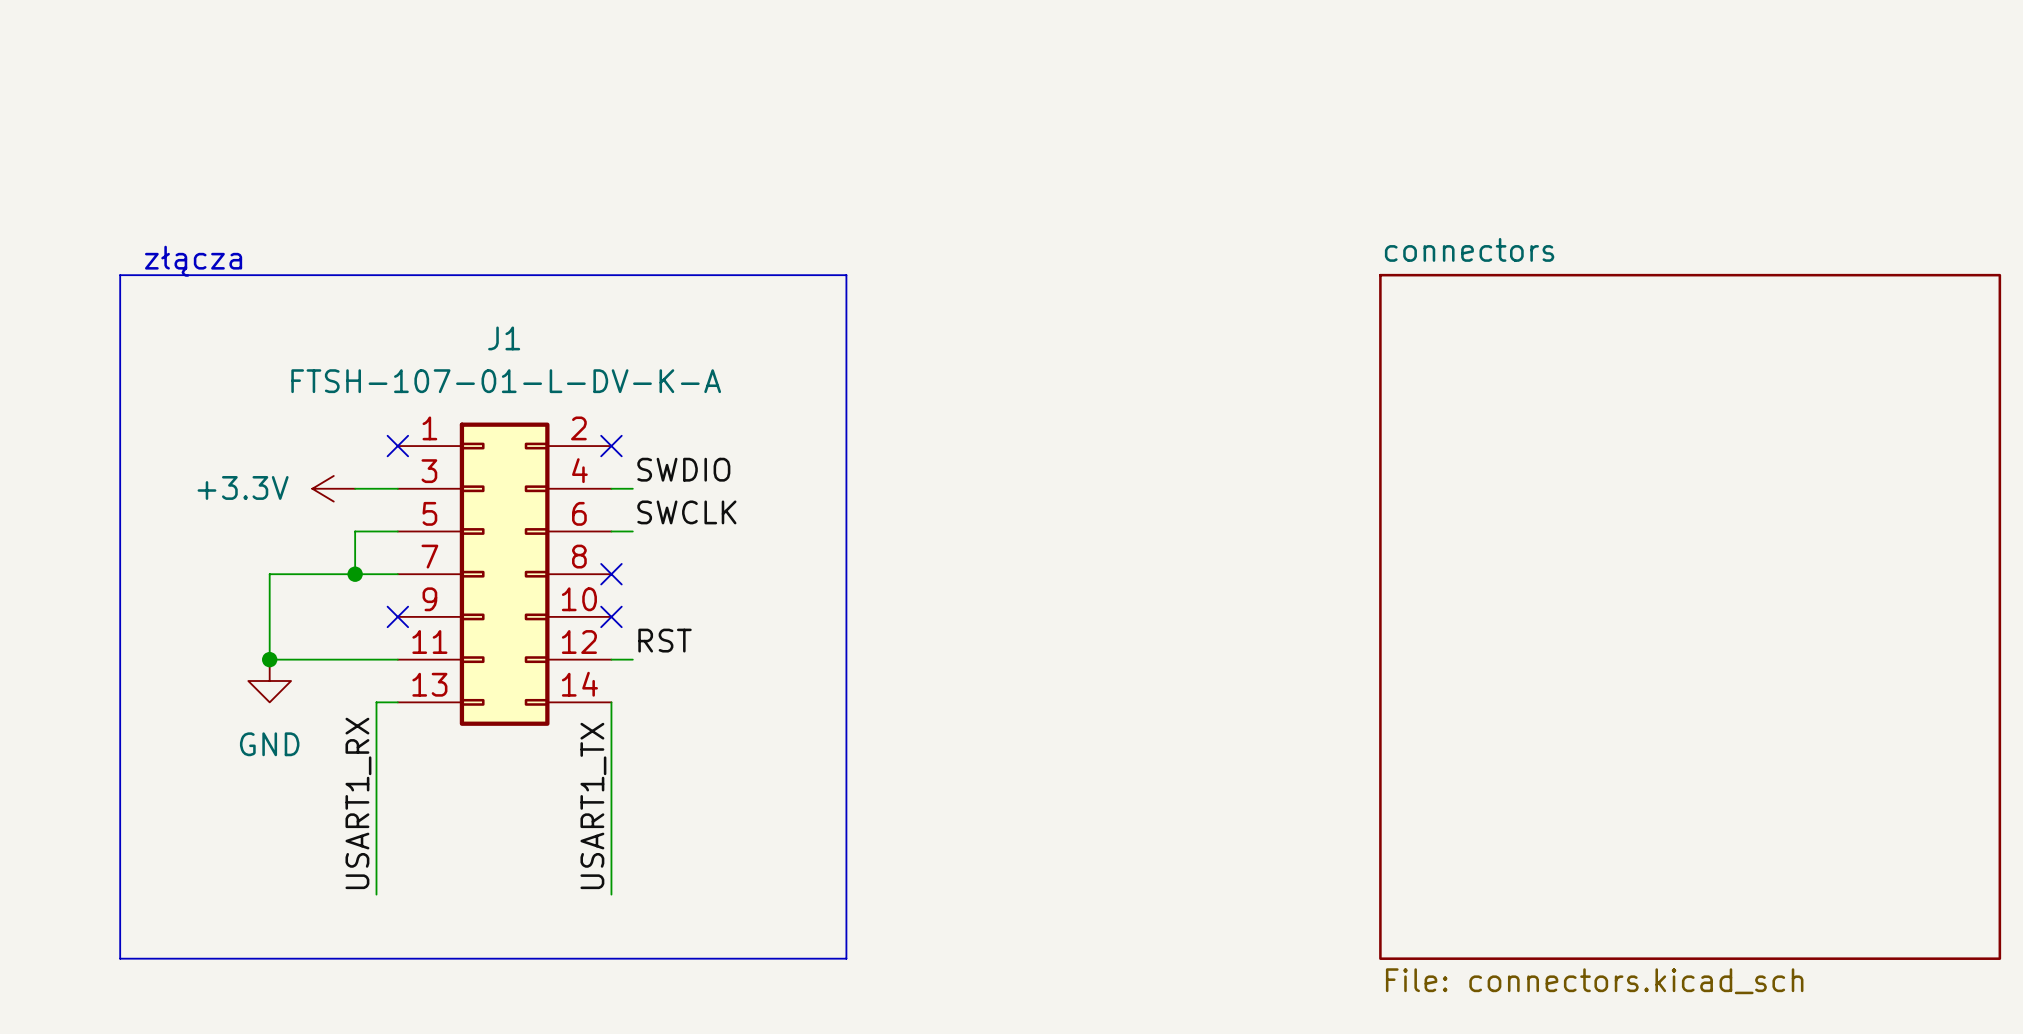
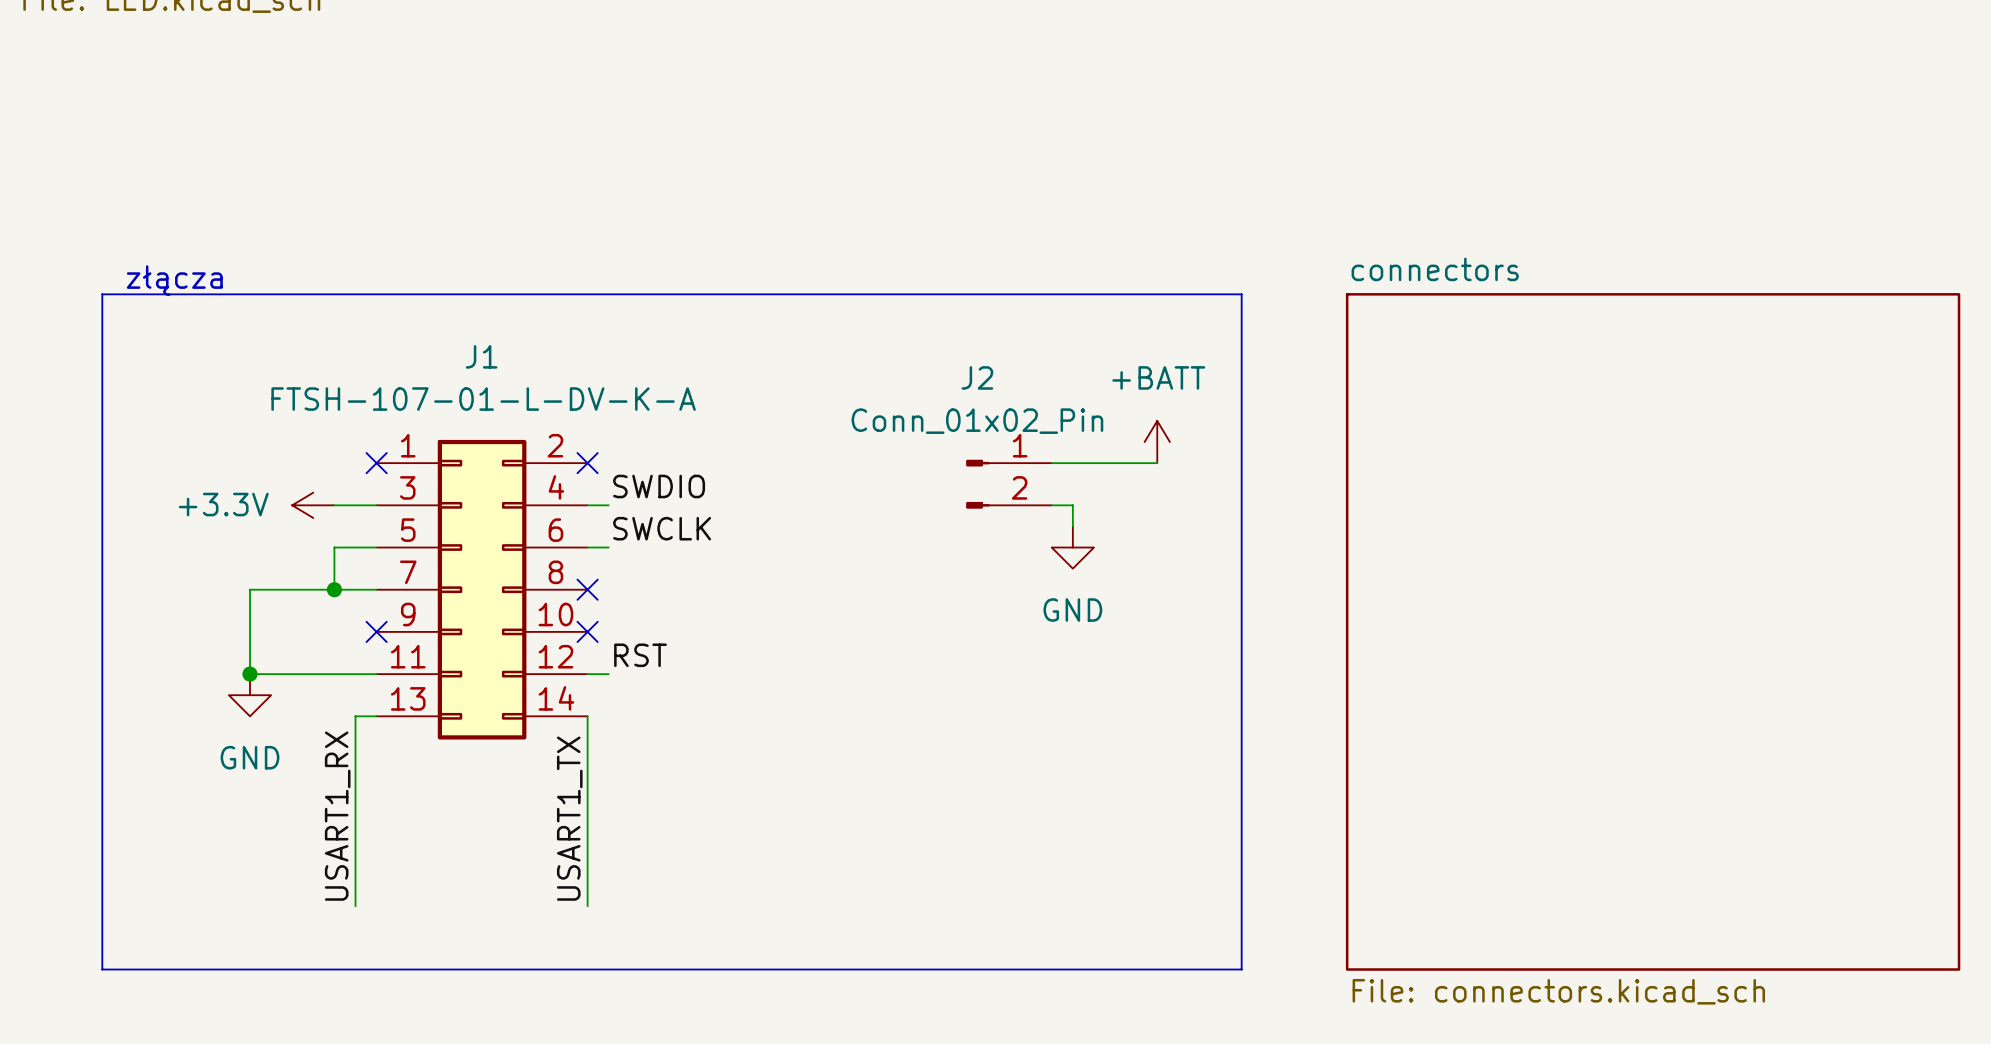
line: (846, 275) (846, 958) -> (819, 294) (1241, 294) (1241, 969) (819, 969)
power symbol: none -> +BATT (1157, 442)
wire: none -> (1051, 463) (1157, 463)
J2: none -> Conn_01x02_Pin (1008, 484)
wire: none -> (1051, 505) (1072, 505) (1072, 526)
power symbol: none -> GND (1072, 547)

